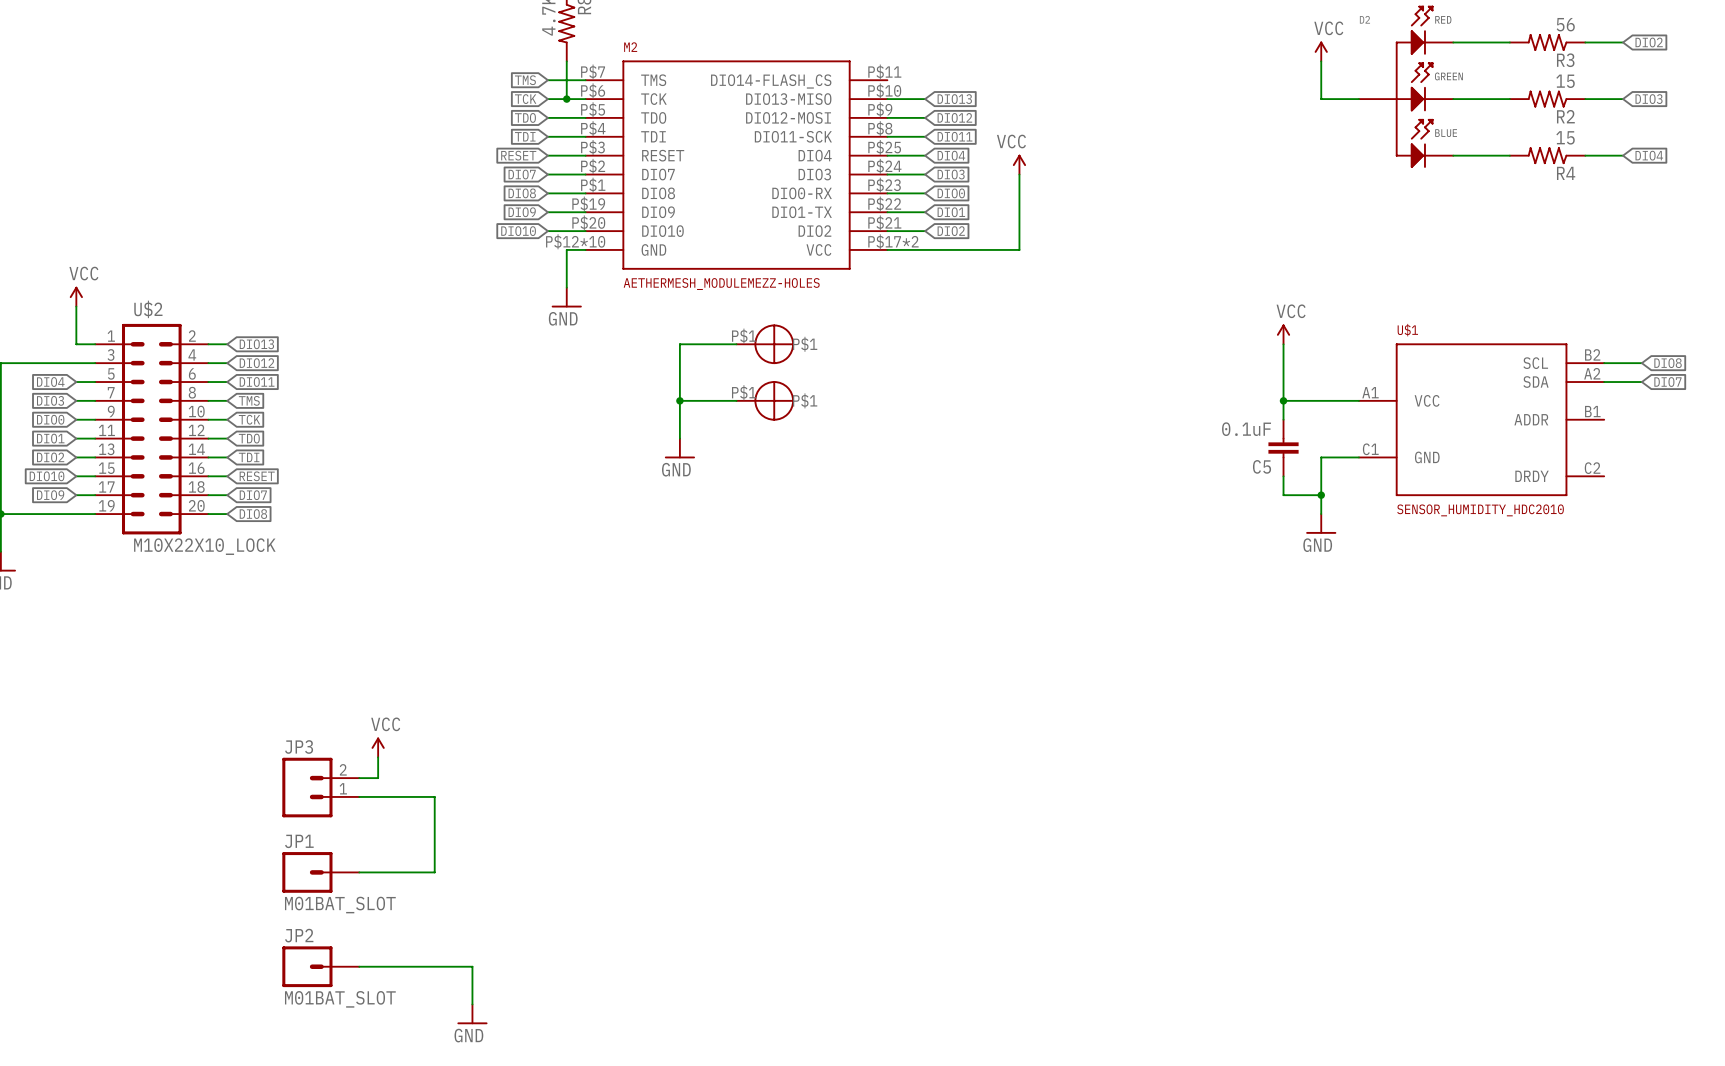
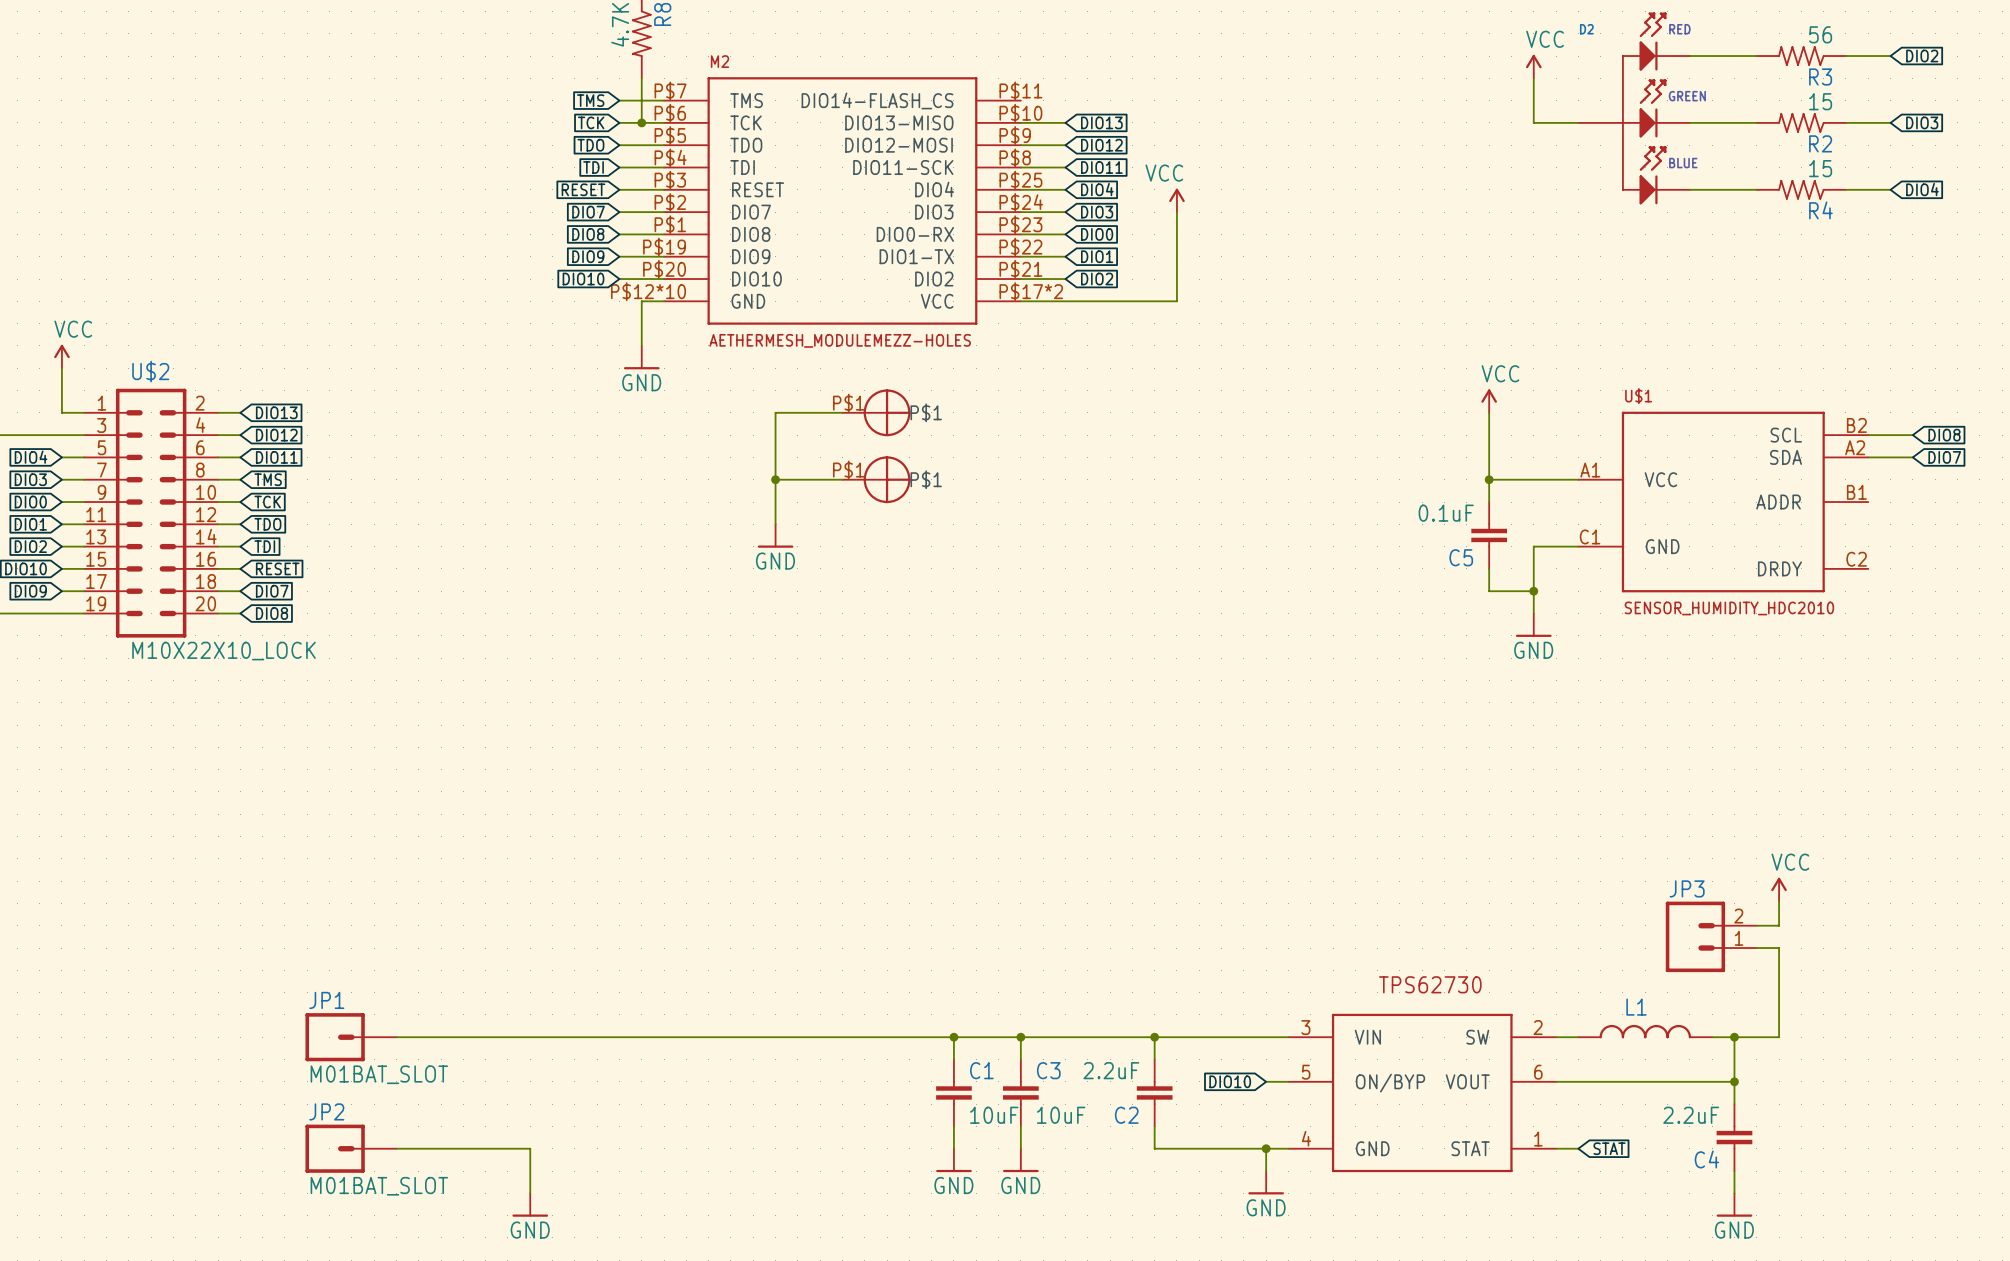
power symbol: VCC (378, 747) -> none
power symbol: none -> VCC (1779, 889)
wire: (378, 757) (378, 778) (359, 778) -> none
wire: none -> (1779, 901) (1779, 925) (1756, 925)
JP3 position: (320, 787) -> (1711, 936)
wire: (359, 796) (434, 796) (434, 872) -> (1288, 1037) (485, 1037)
wire: none -> (1756, 948) (1779, 948) (1779, 1037) (1712, 1037)
L1: none -> (1645, 1031)
wire: none -> (953, 1037) (953, 1059)
junction: none -> (953, 1037)
wire: none -> (1020, 1037) (1020, 1059)
junction: none -> (1020, 1037)
wire: none -> (1154, 1037) (1154, 1059)
junction: none -> (1154, 1037)
wire: none -> (1556, 1037) (1578, 1037)
wire: none -> (1734, 1037) (1734, 1104)
junction: none -> (1734, 1037)
global label: none -> DIO10 (1230, 1081)
wire: none -> (1266, 1081) (1288, 1081)
wire: none -> (1556, 1081) (1734, 1081)
junction: none -> (1734, 1081)
C1: none -> 10uF (953, 1092)
C3: none -> 10uF (1020, 1092)
C2: none -> 2.2uF (1154, 1092)
part: none -> (1422, 1092)
wire: none -> (953, 1126) (953, 1148)
wire: none -> (1020, 1126) (1020, 1148)
wire: none -> (1154, 1126) (1154, 1148) (1288, 1148)
C4: none -> 2.2uF (1734, 1137)
wire: none -> (1266, 1148) (1266, 1171)
junction: none -> (1266, 1148)
wire: none -> (1556, 1148) (1578, 1148)
global label: none -> STAT (1609, 1148)
power symbol: none -> GND (953, 1160)
power symbol: none -> GND (1020, 1160)
wire: none -> (1734, 1171) (1734, 1193)
power symbol: none -> GND (1266, 1182)
power symbol: none -> GND (1734, 1205)

